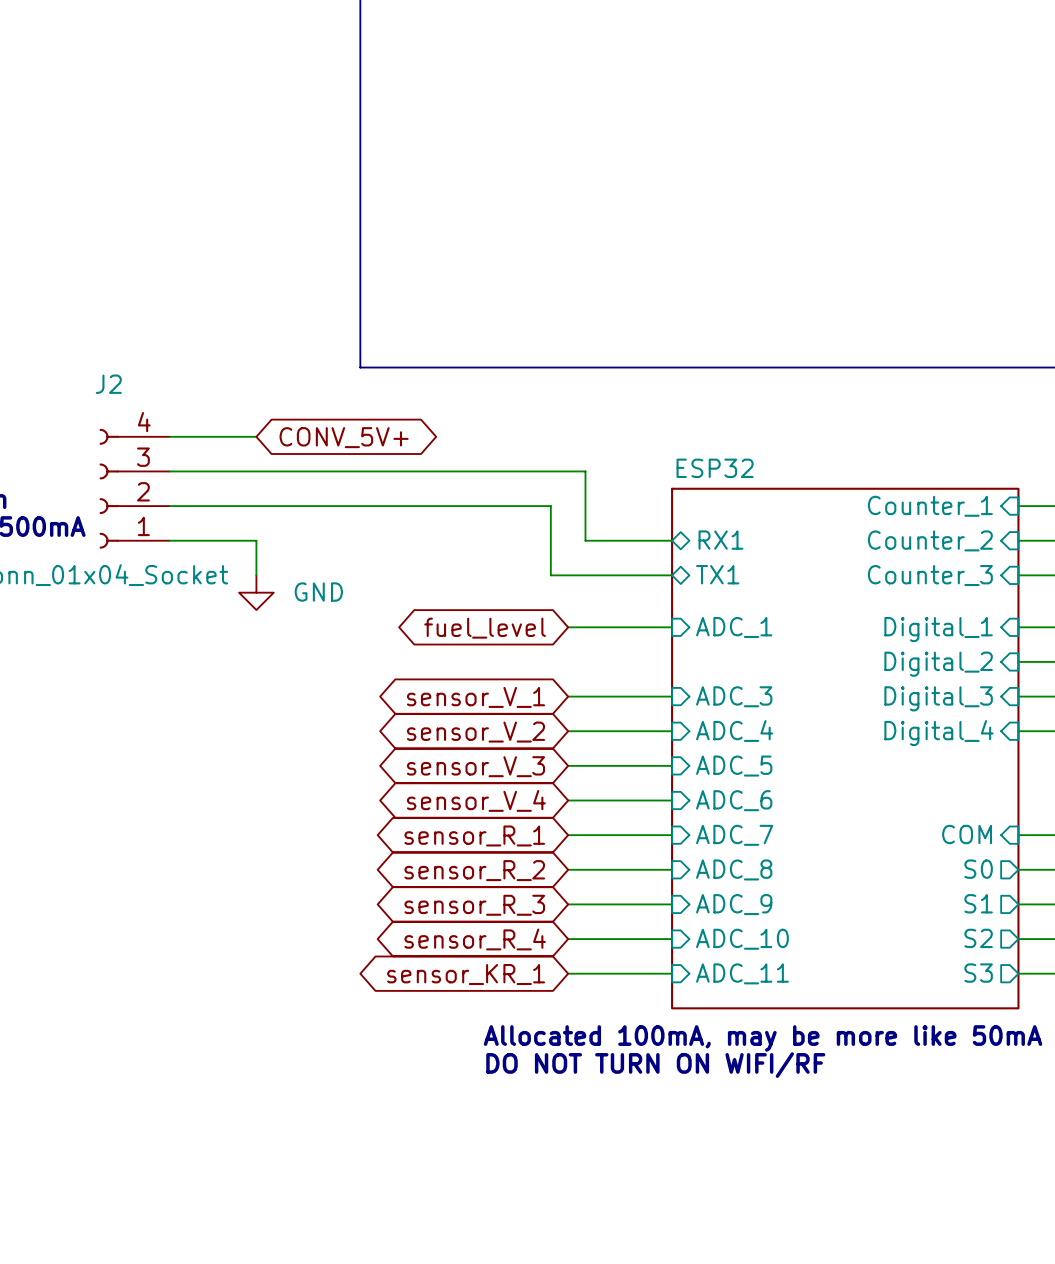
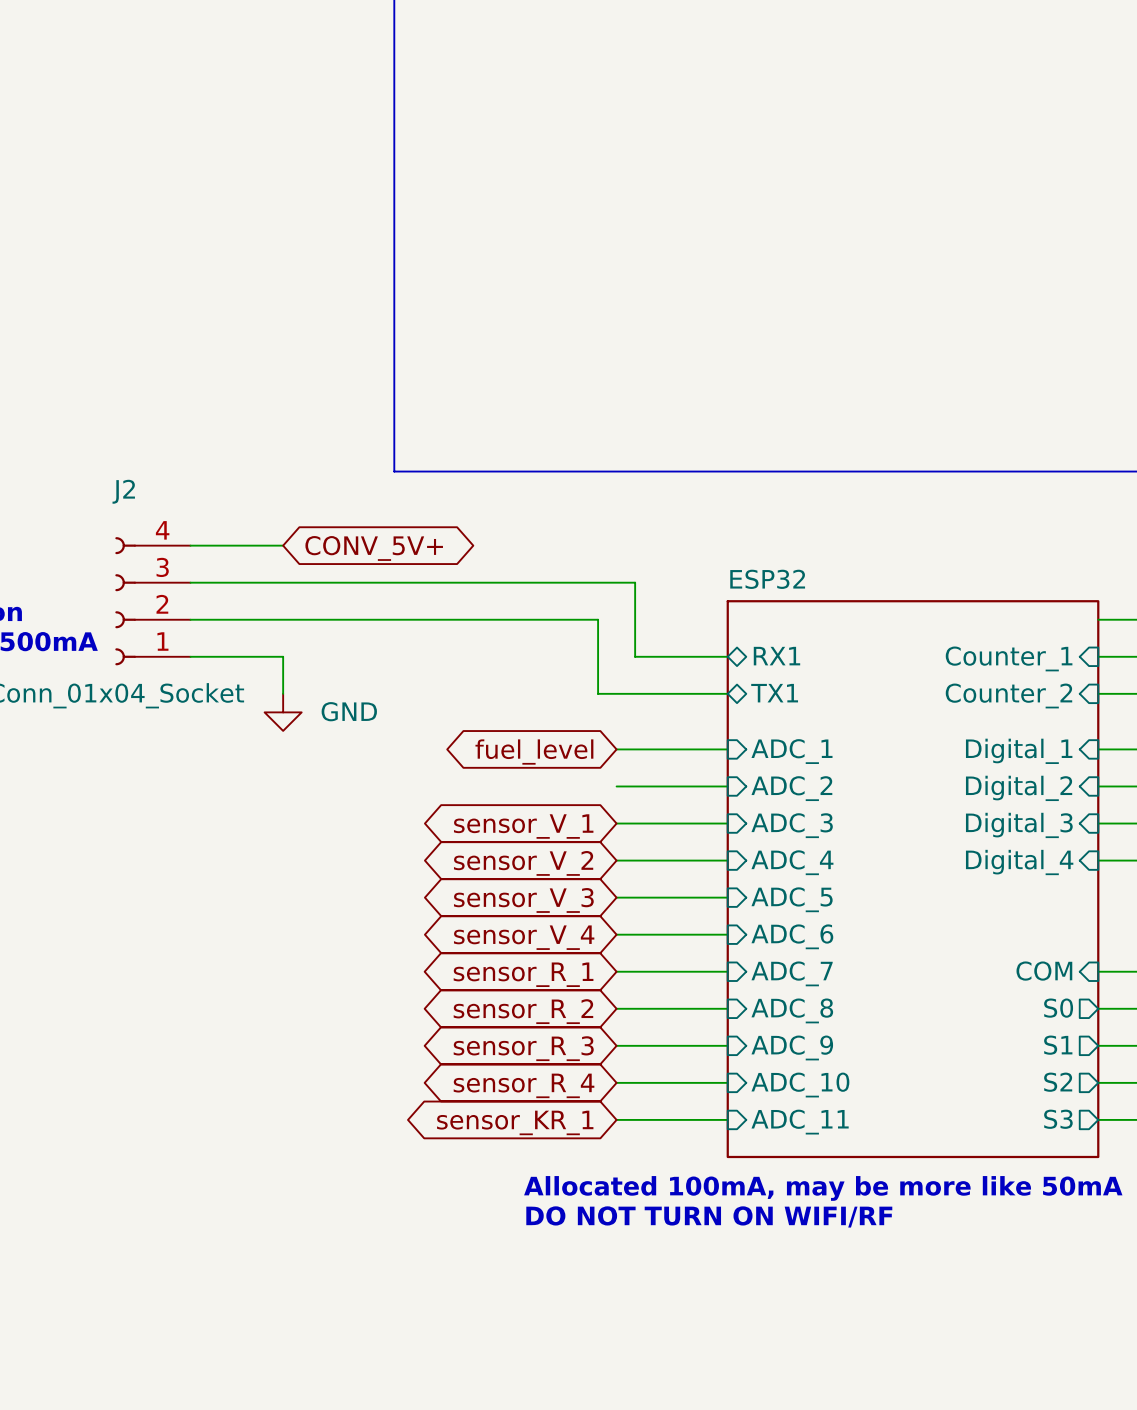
sheet pin: Counter_1 (930, 506) -> none
sheet pin: Counter_2 (930, 540) -> Counter_1 (1009, 658)
sheet pin: Counter_3 (930, 575) -> Counter_2 (1008, 695)
wire: none -> (616, 786) (727, 786)
sheet pin: none -> ADC_2 (791, 788)

